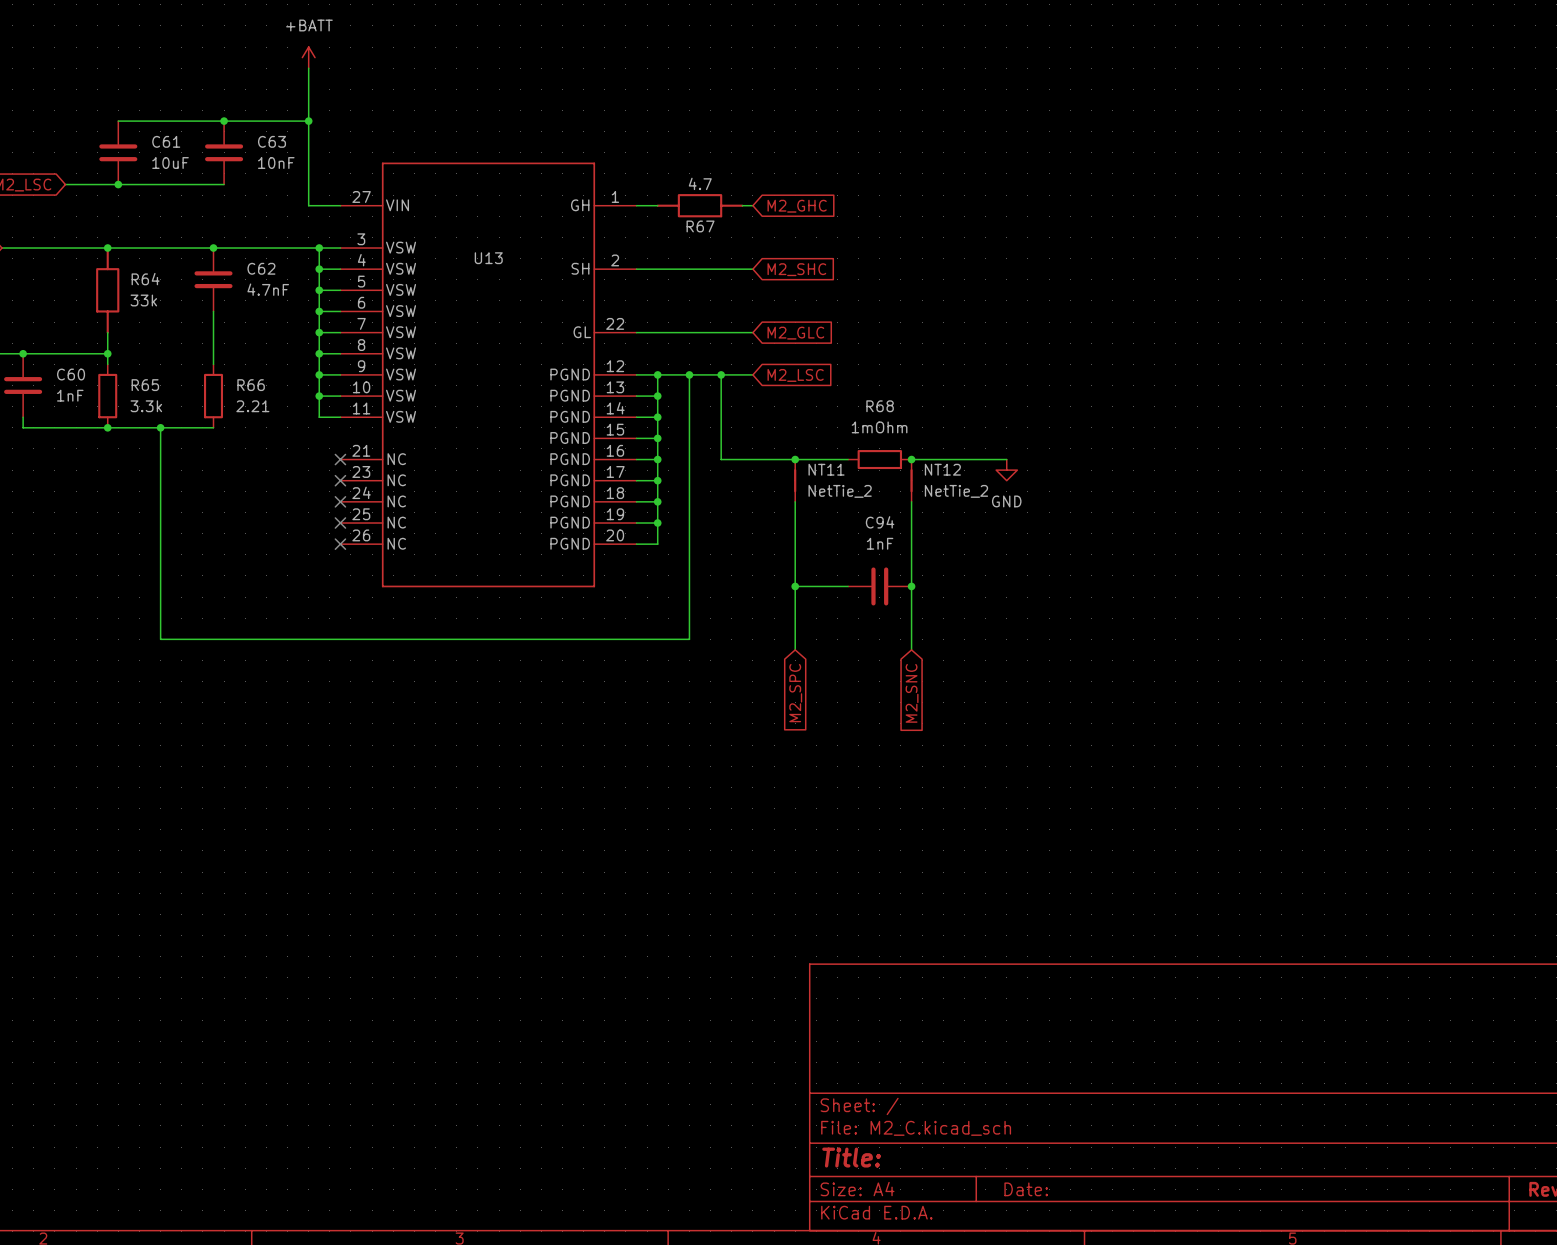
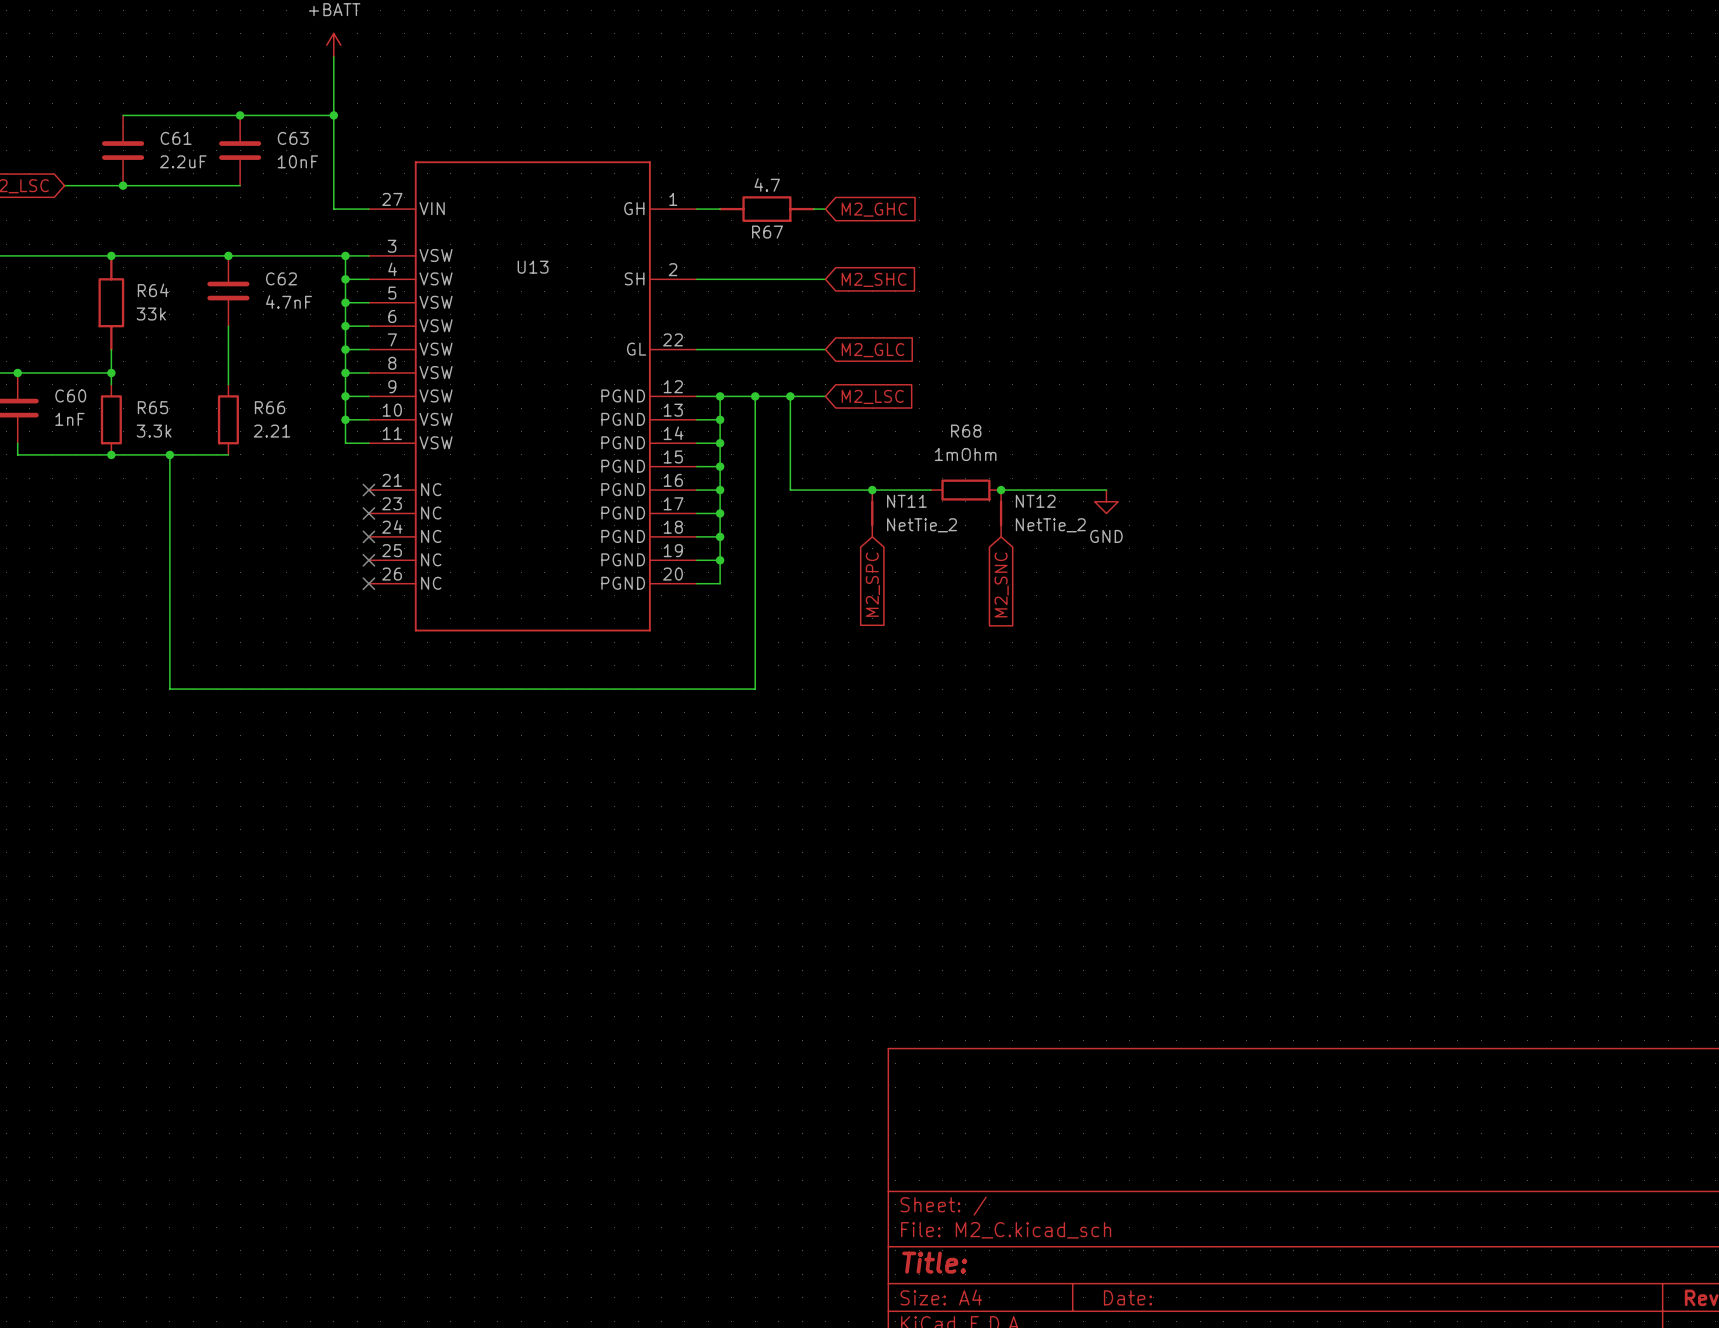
C61 value: 10uF (170, 163) -> 2.2uF (183, 161)
wire: (795, 501) (795, 649) -> none
wire: (911, 501) (911, 649) -> none
wire: (795, 586) (848, 586) -> none
junction: (795, 586) -> none
C94: 1nF (879, 586) -> none
junction: (911, 586) -> none
global label position: M2_SPC (795, 693) -> M2_SPC (872, 584)
global label position: M2_SNC (912, 693) -> M2_SNC (1001, 584)

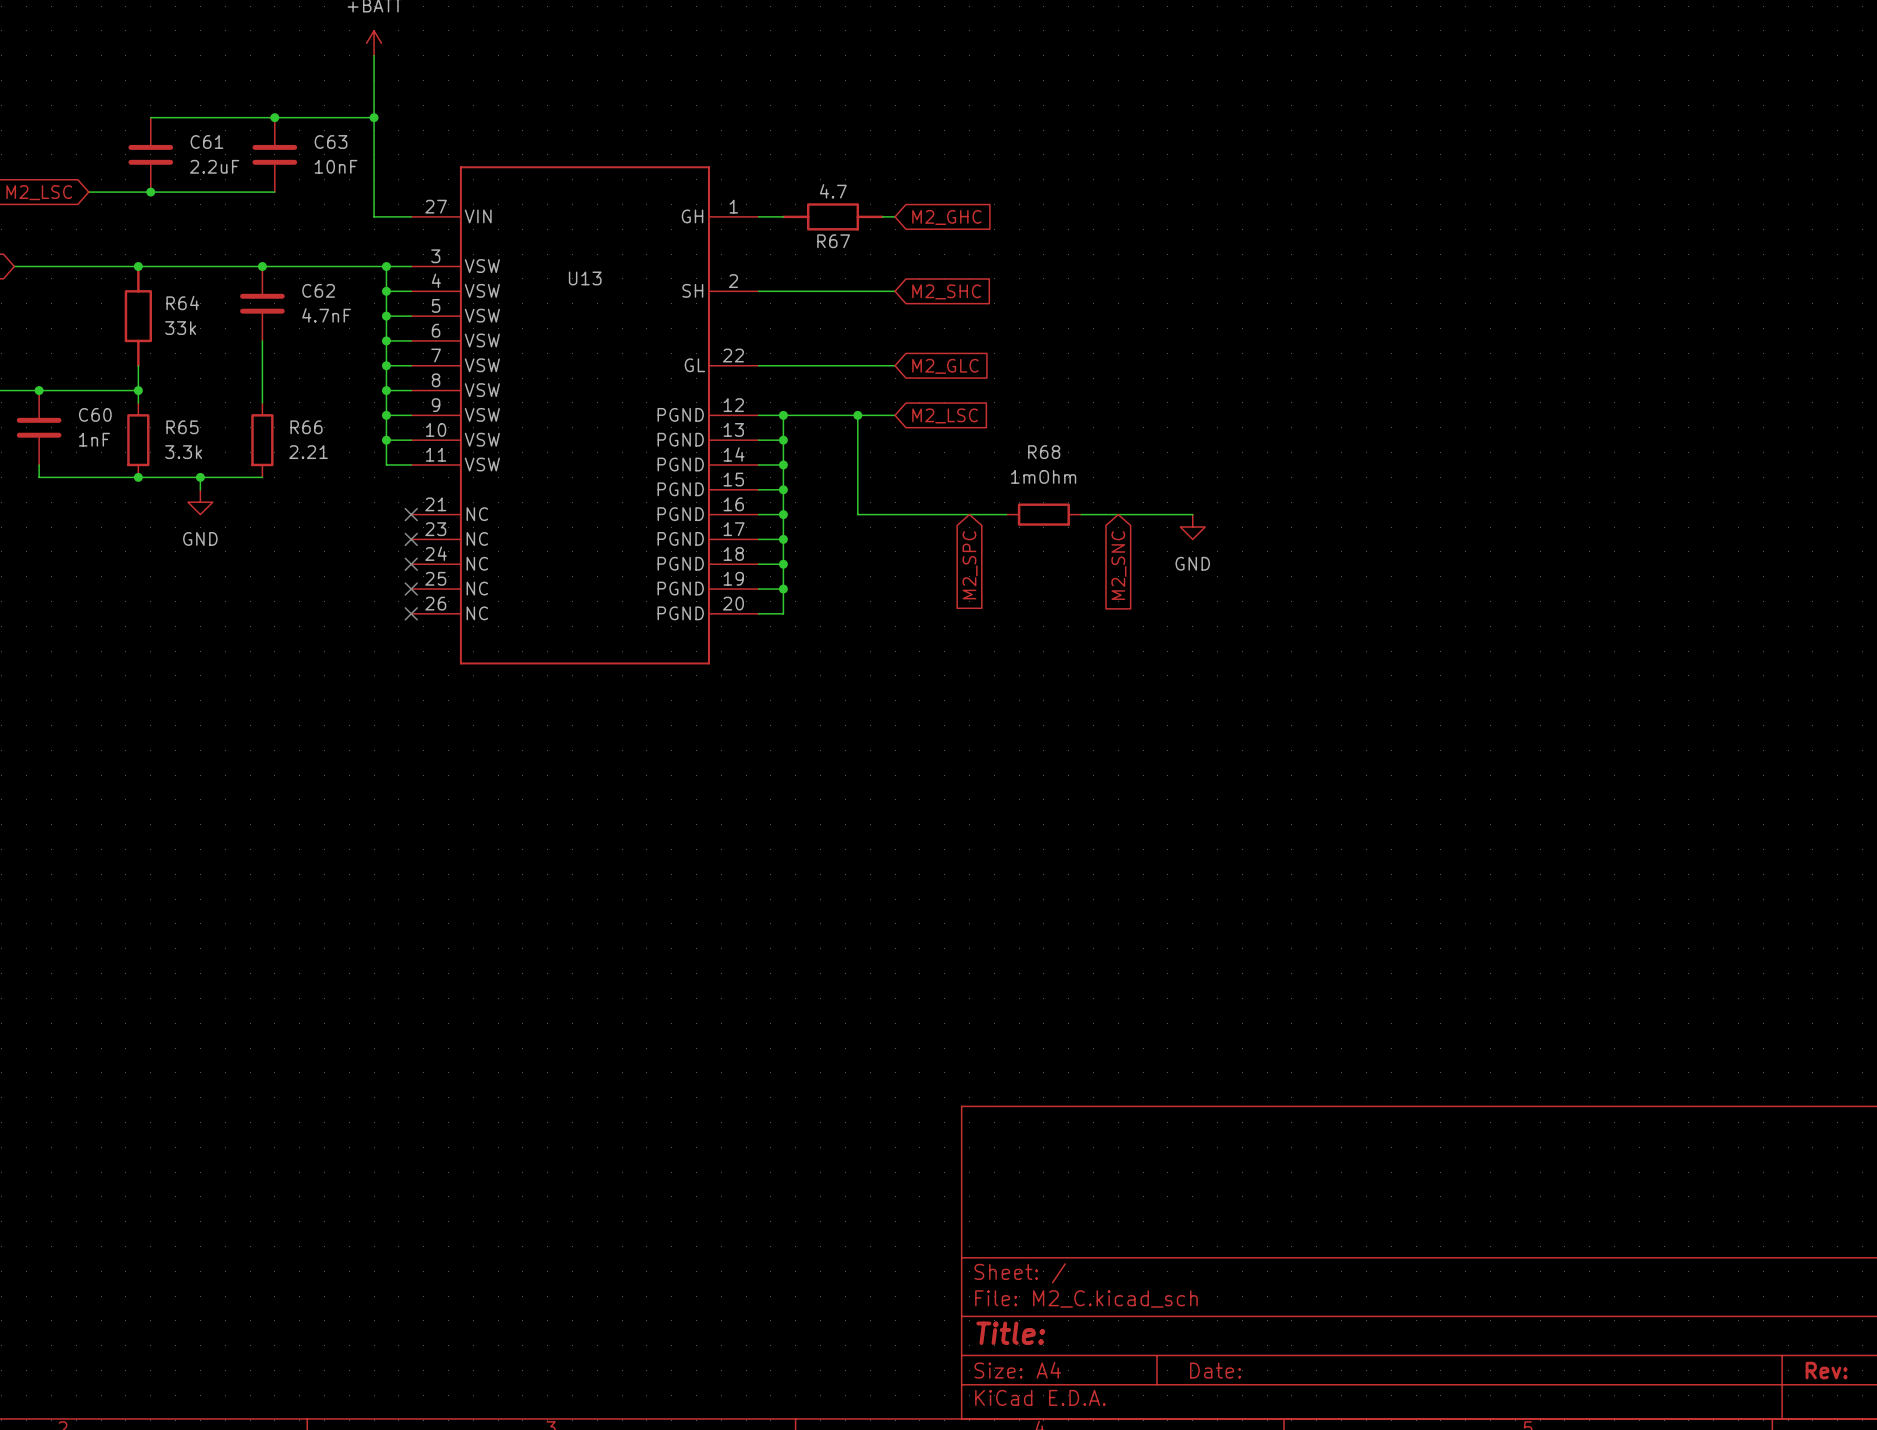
wire: (755, 396) (755, 689) (169, 689) (169, 466) -> none
junction: (755, 396) -> none
power symbol: none -> GND (200, 502)
junction: (872, 490) -> none
junction: (1001, 490) -> none
NT11: NetTie_2 (872, 513) -> none
NT12: NetTie_2 (1001, 513) -> none
global label position: M2_SPC (872, 584) -> M2_SPC (970, 565)
global label position: M2_SNC (1001, 584) -> M2_SNC (1118, 565)

